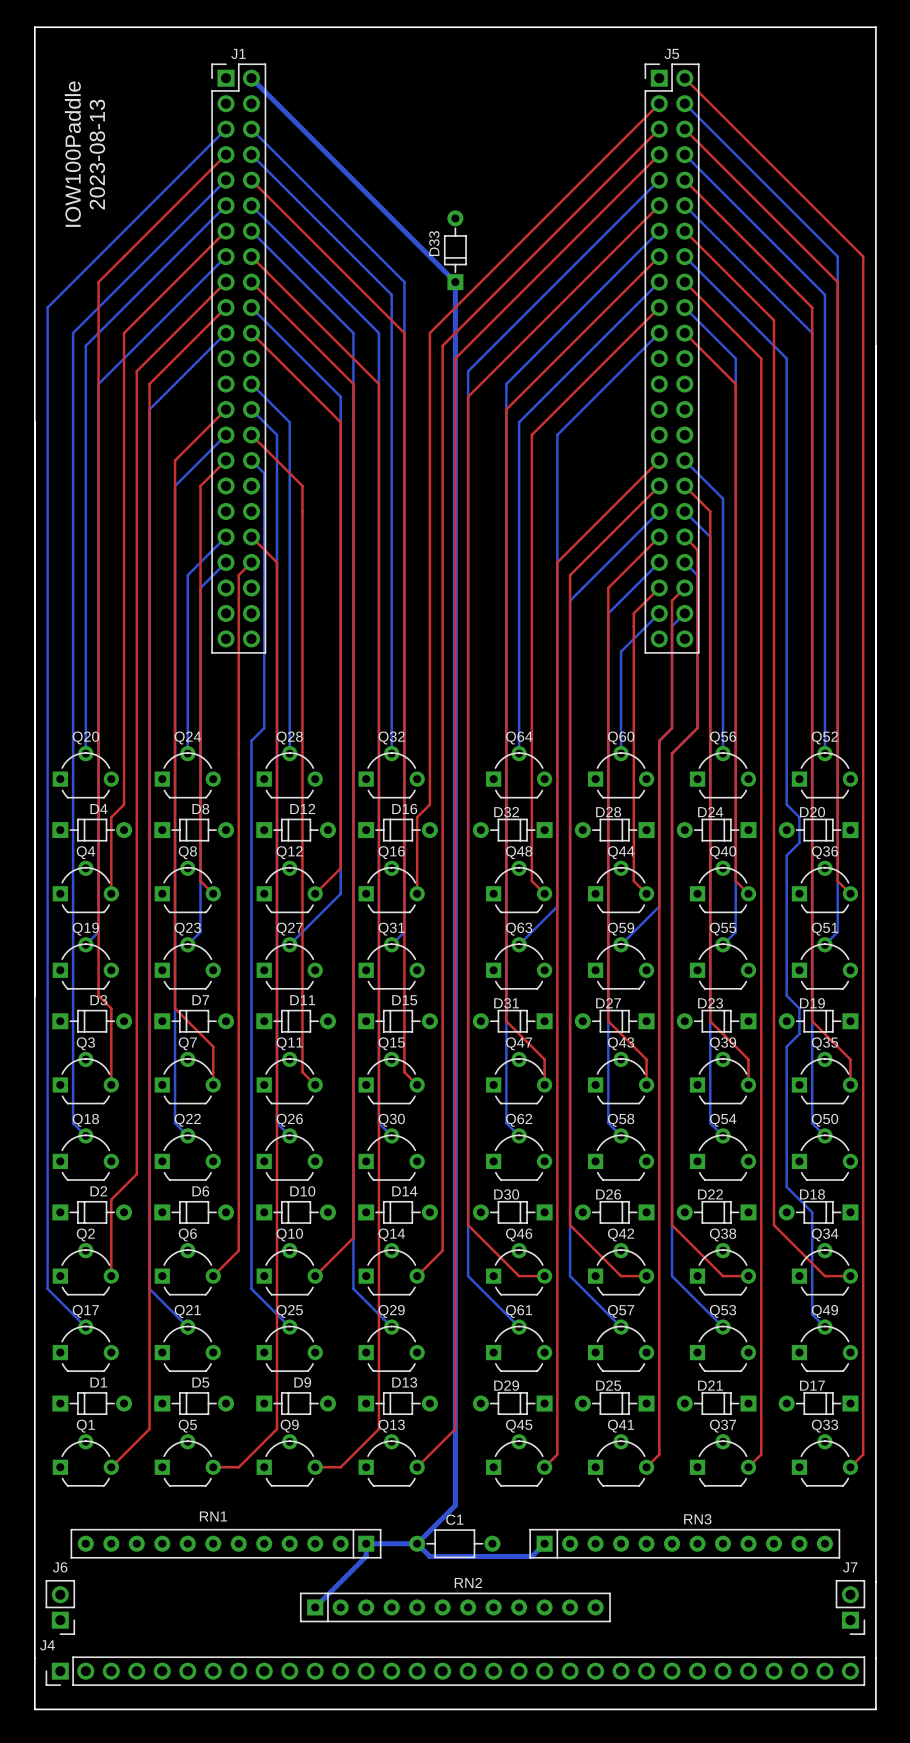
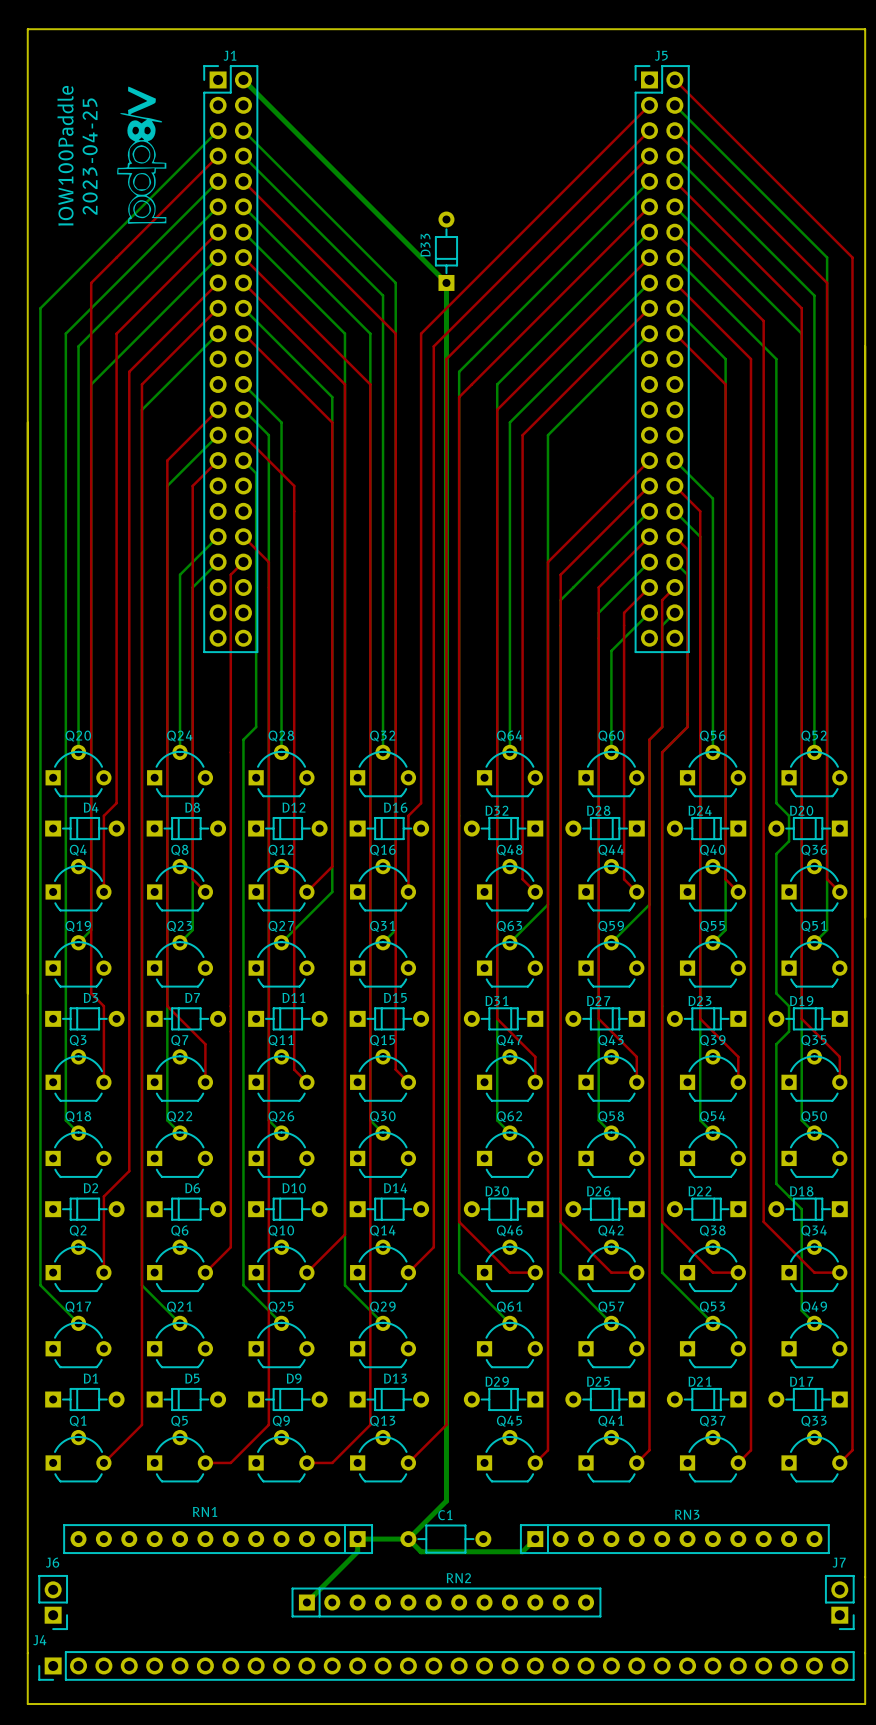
drawing: none -> [117, 86, 167, 224]
text: 2023-08-13 (97, 154) -> 2023-04-25 (90, 156)

